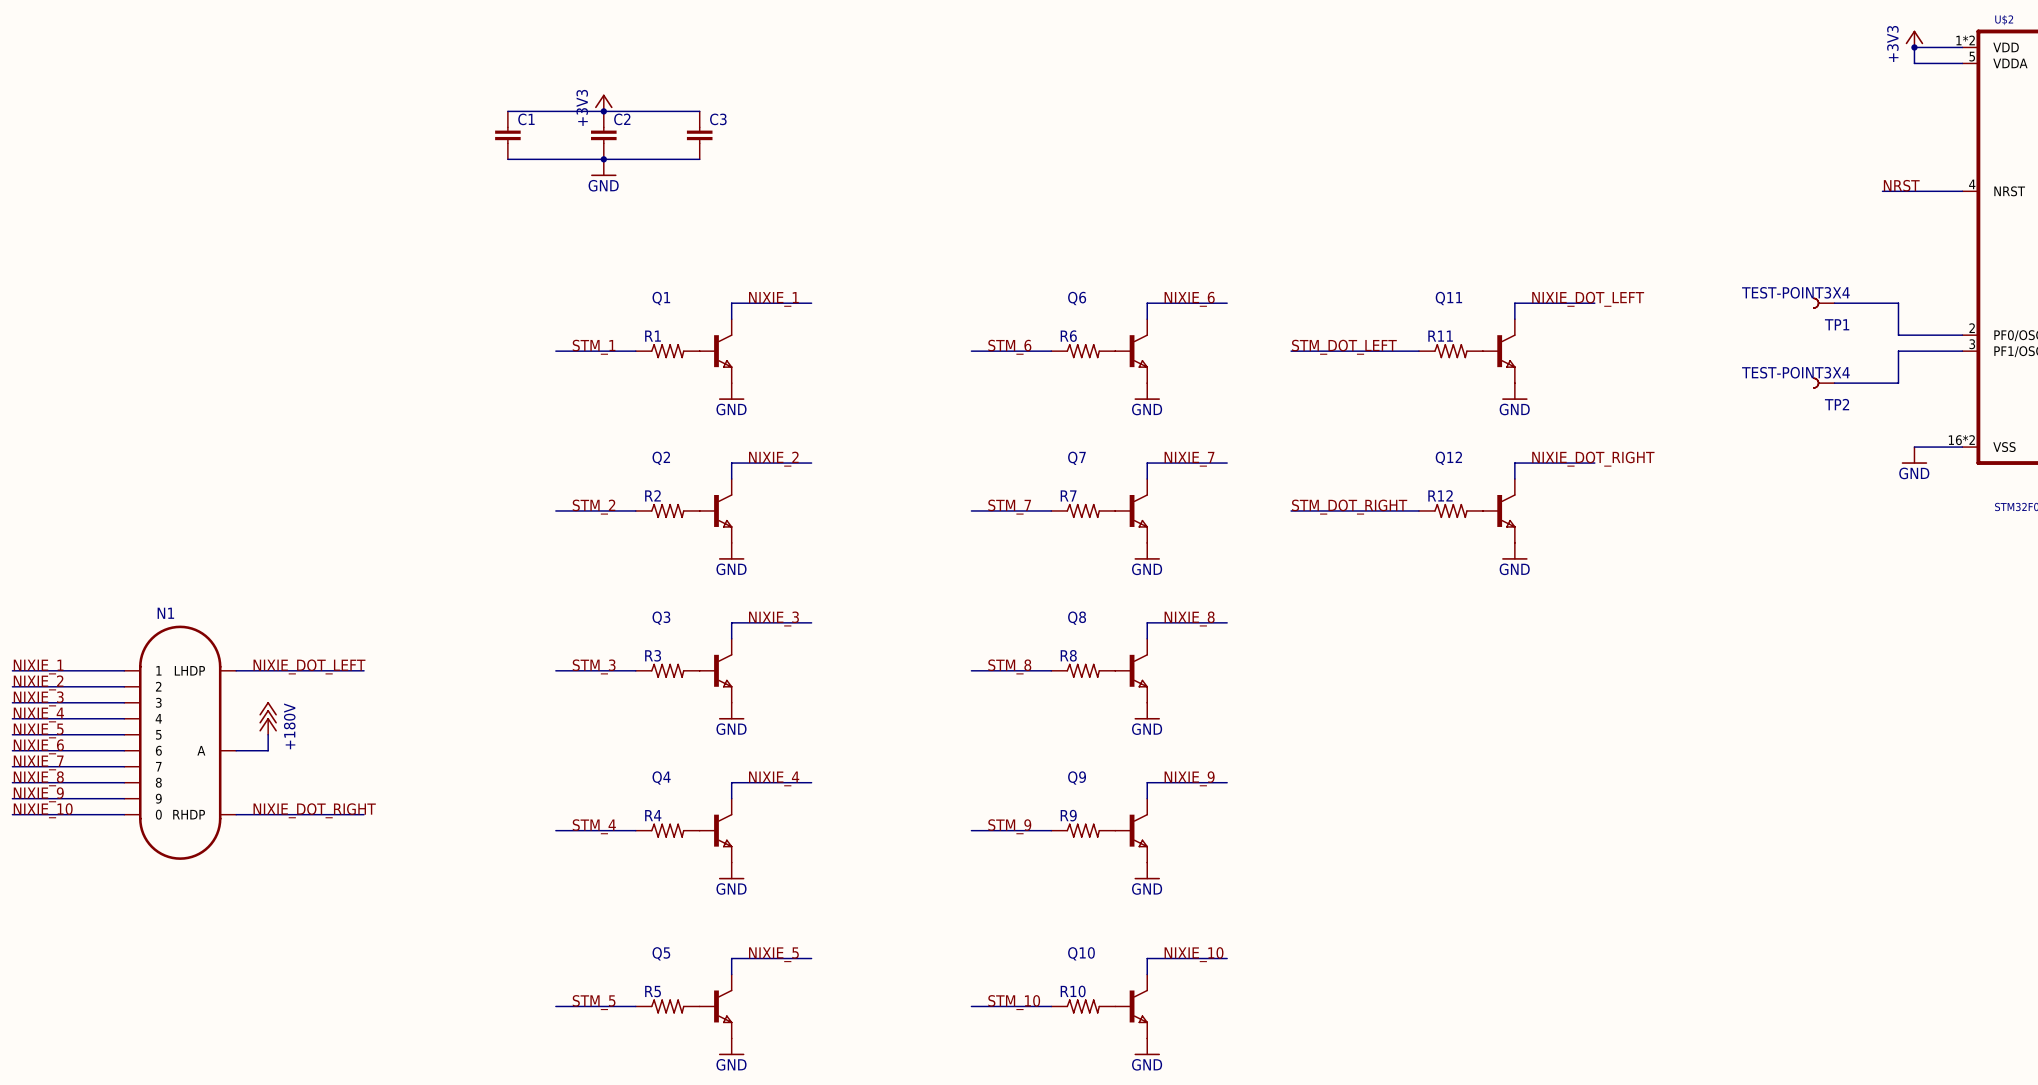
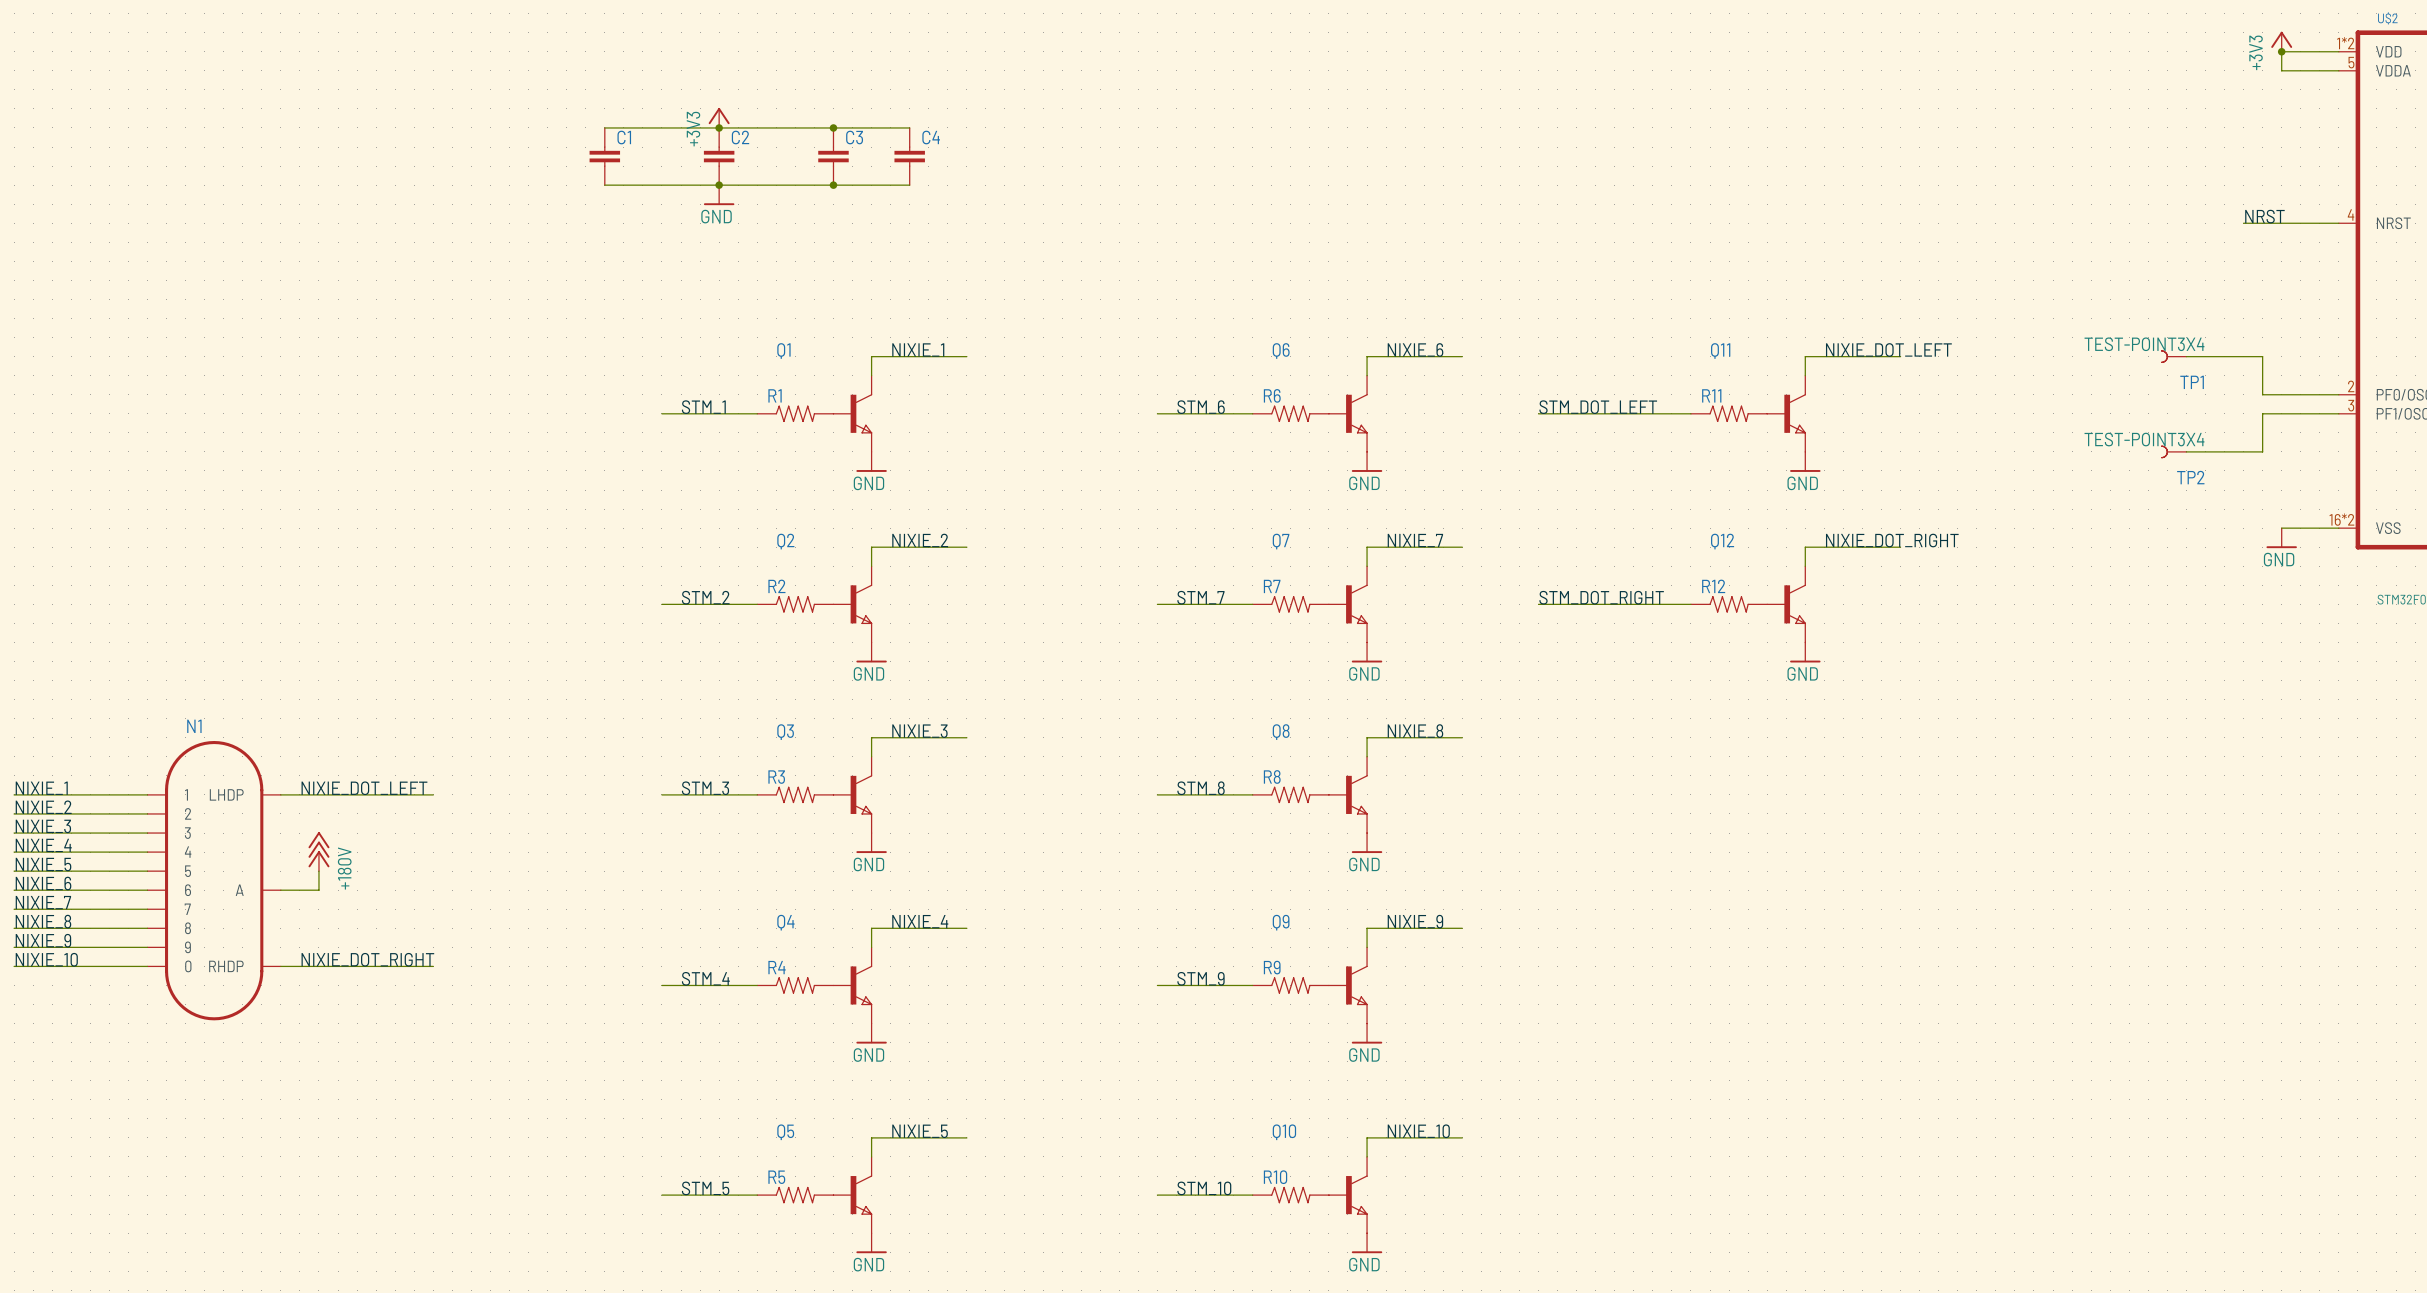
wire: none -> (833, 127) (909, 127)
junction: none -> (833, 127)
C4: none -> (909, 156)
wire: none -> (833, 185) (909, 185)
junction: none -> (833, 185)

